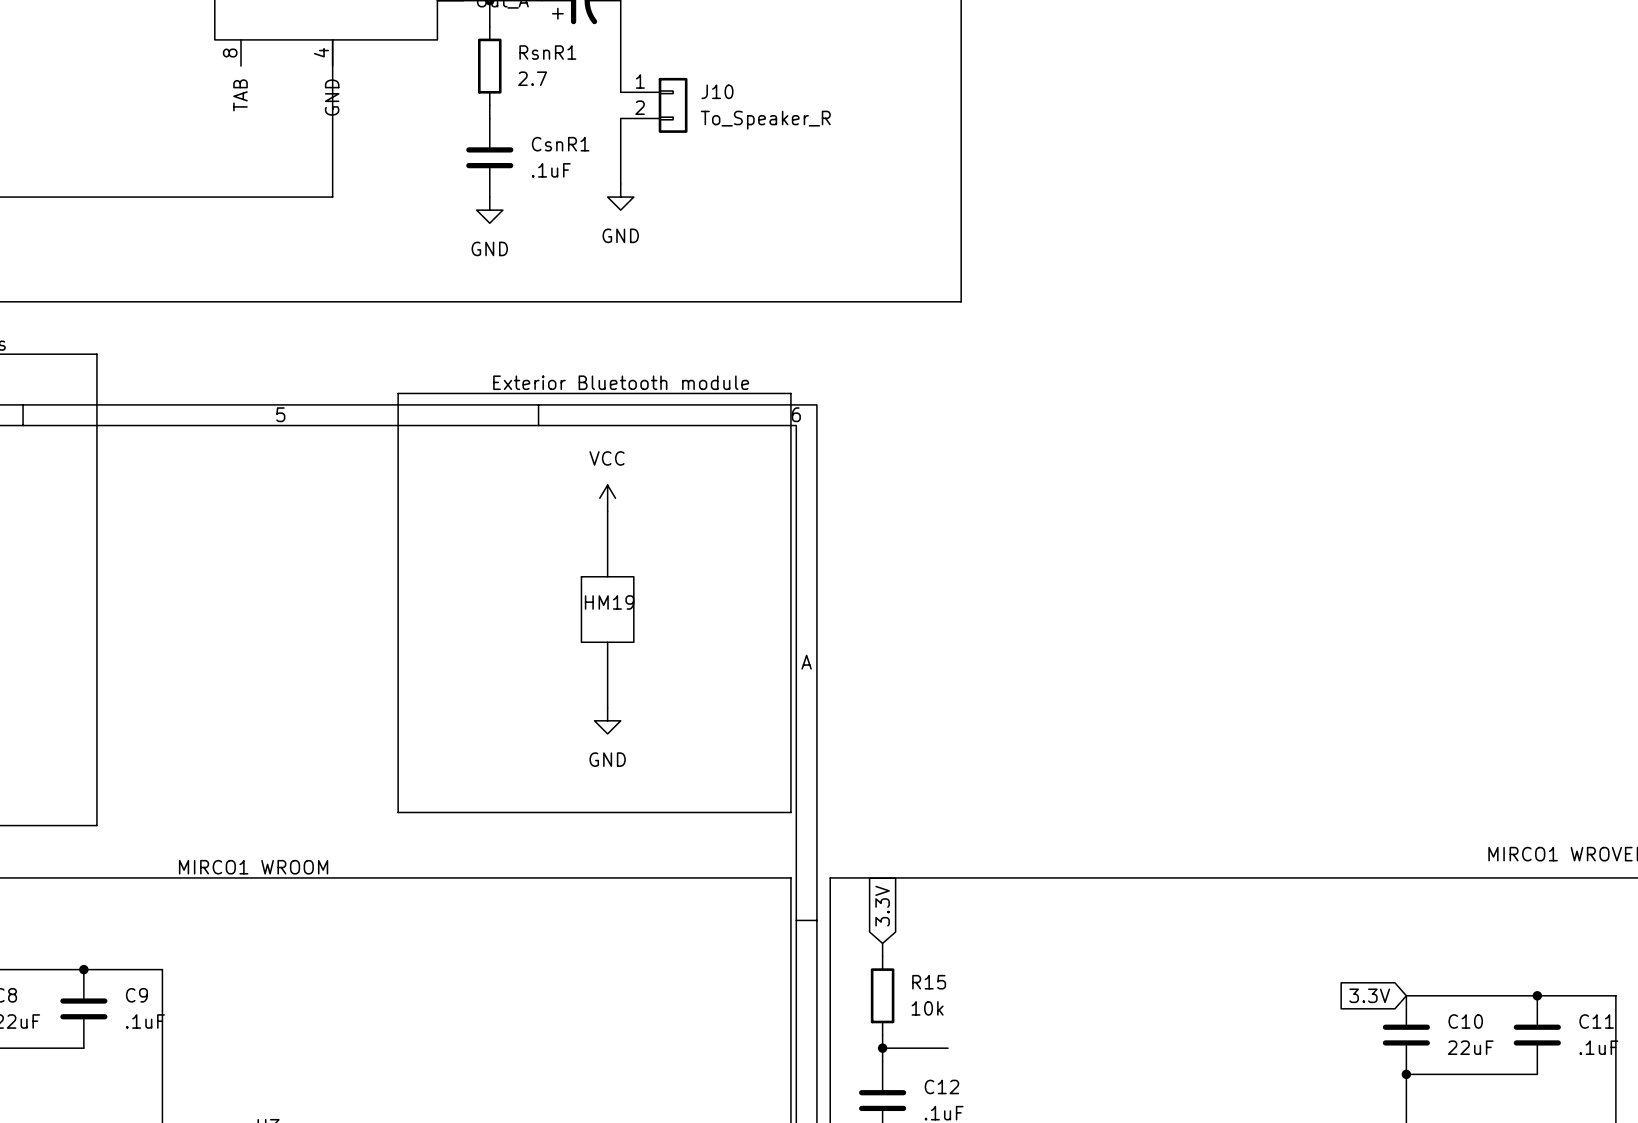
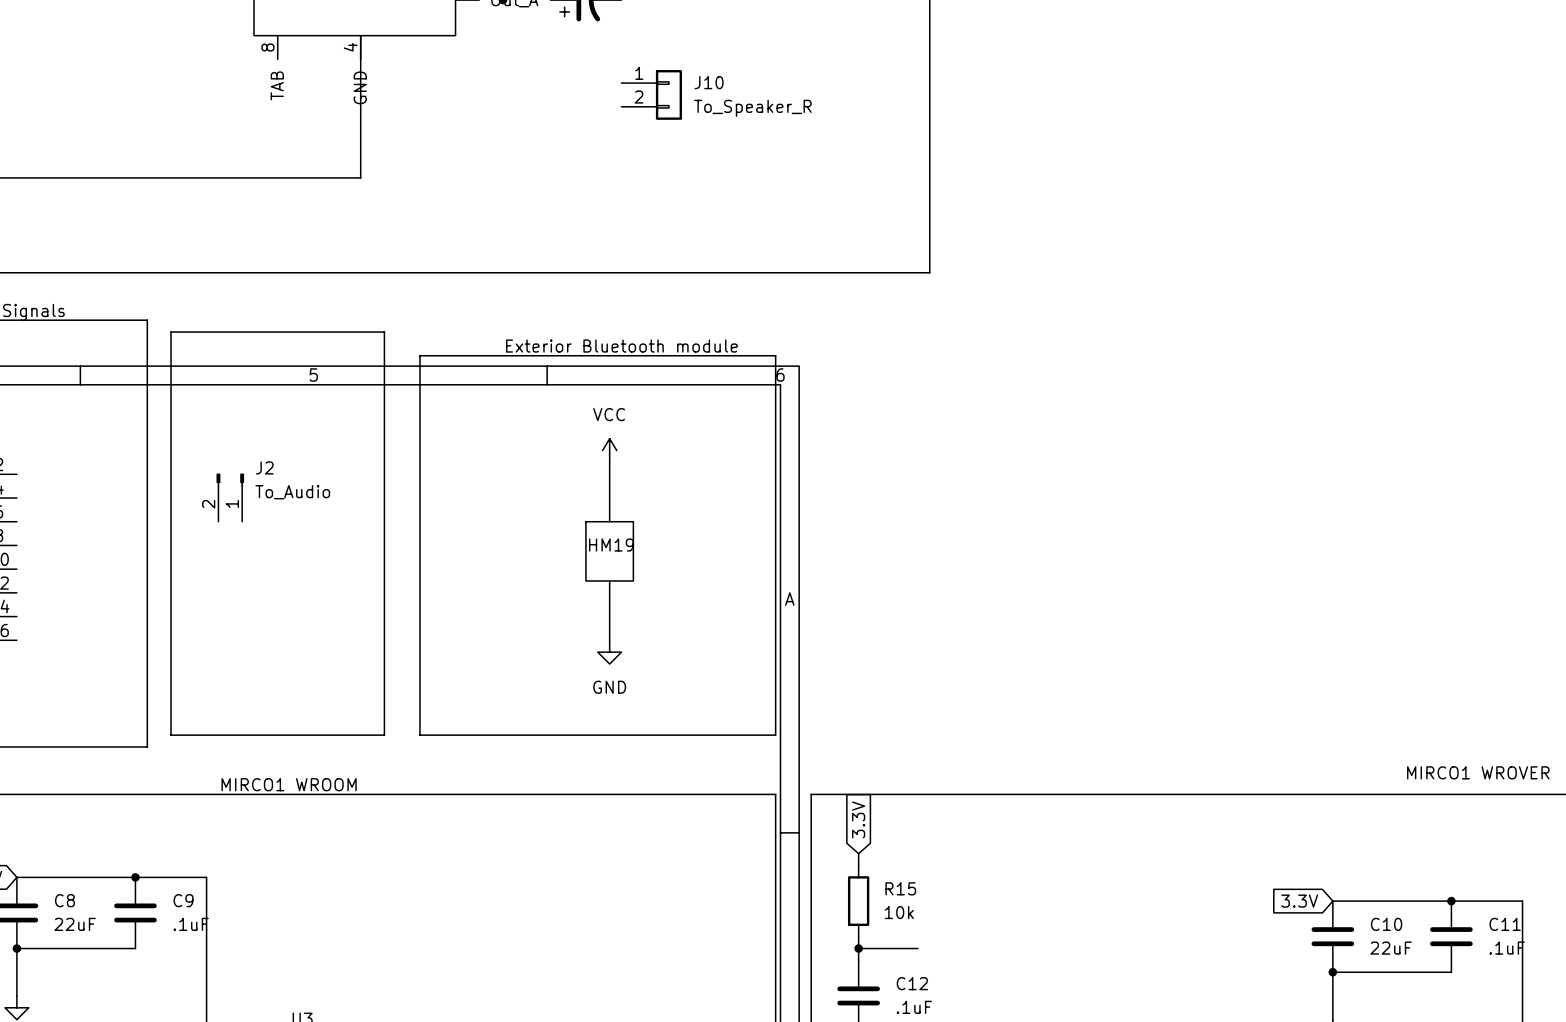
wire: (437, 0) (542, 0) -> none
wire: (489, 0) (489, 26) -> none
wire: (620, 0) (620, 92) -> none
RsnR1: 2.7 (489, 66) -> none
wire: (489, 105) (489, 118) -> none
wire: (620, 118) (620, 183) -> none
CsnR1: .1uF (489, 157) -> none
power symbol: GND (620, 197) -> none
power symbol: GND (489, 210) -> none
line: none -> (171, 332) (384, 332) (384, 735) (171, 735) (171, 332)
J2: none -> To_Audio (230, 497)

